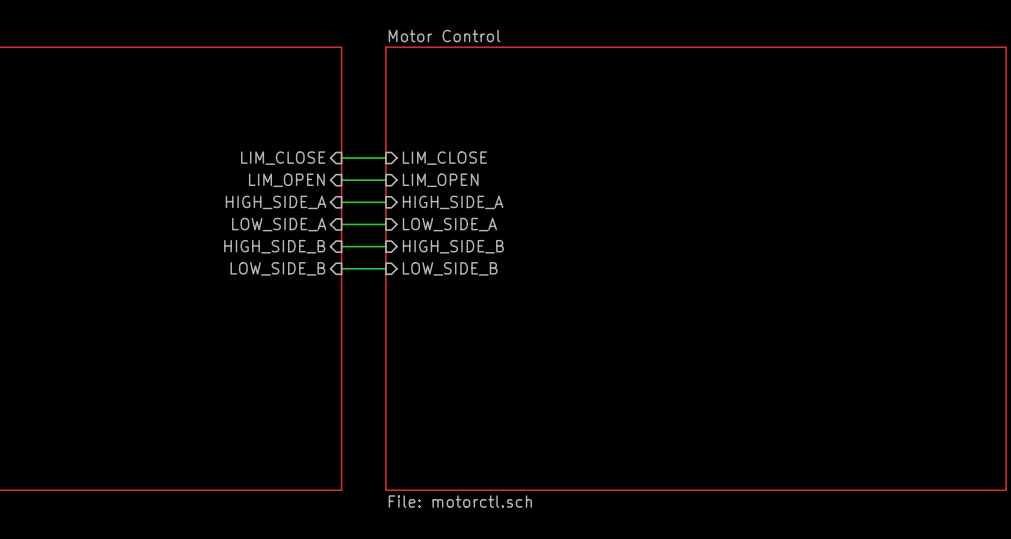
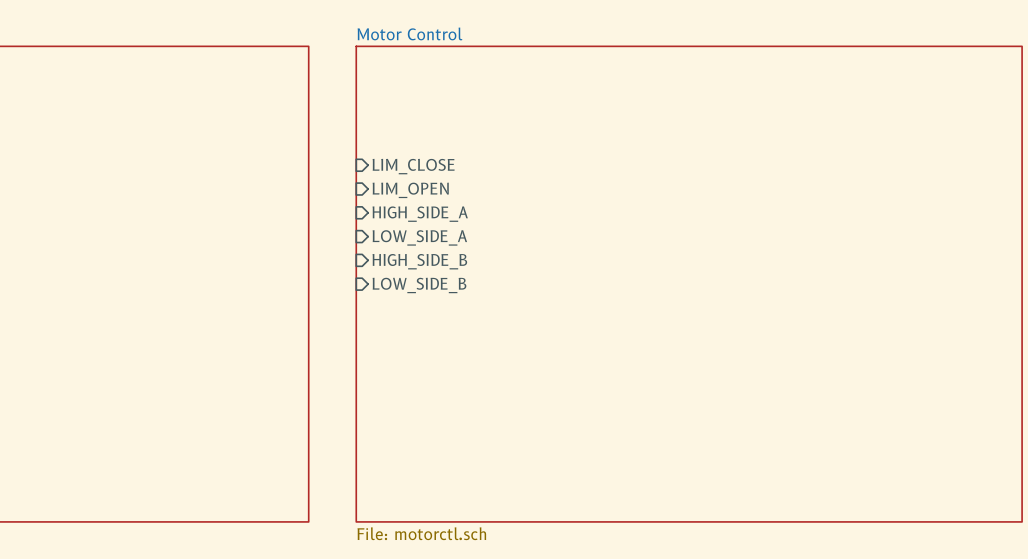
sheet pin: LIM_CLOSE (283, 158) -> none
wire: (341, 158) (385, 158) -> none
sheet pin: LIM_OPEN (286, 180) -> none
wire: (341, 180) (385, 180) -> none
sheet pin: HIGH_SIDE_A (276, 202) -> none
wire: (341, 202) (385, 202) -> none
sheet pin: LOW_SIDE_A (279, 224) -> none
wire: (341, 224) (385, 224) -> none
sheet pin: HIGH_SIDE_B (274, 246) -> none
wire: (341, 246) (385, 246) -> none
sheet pin: LOW_SIDE_B (277, 268) -> none
wire: (341, 268) (385, 268) -> none

